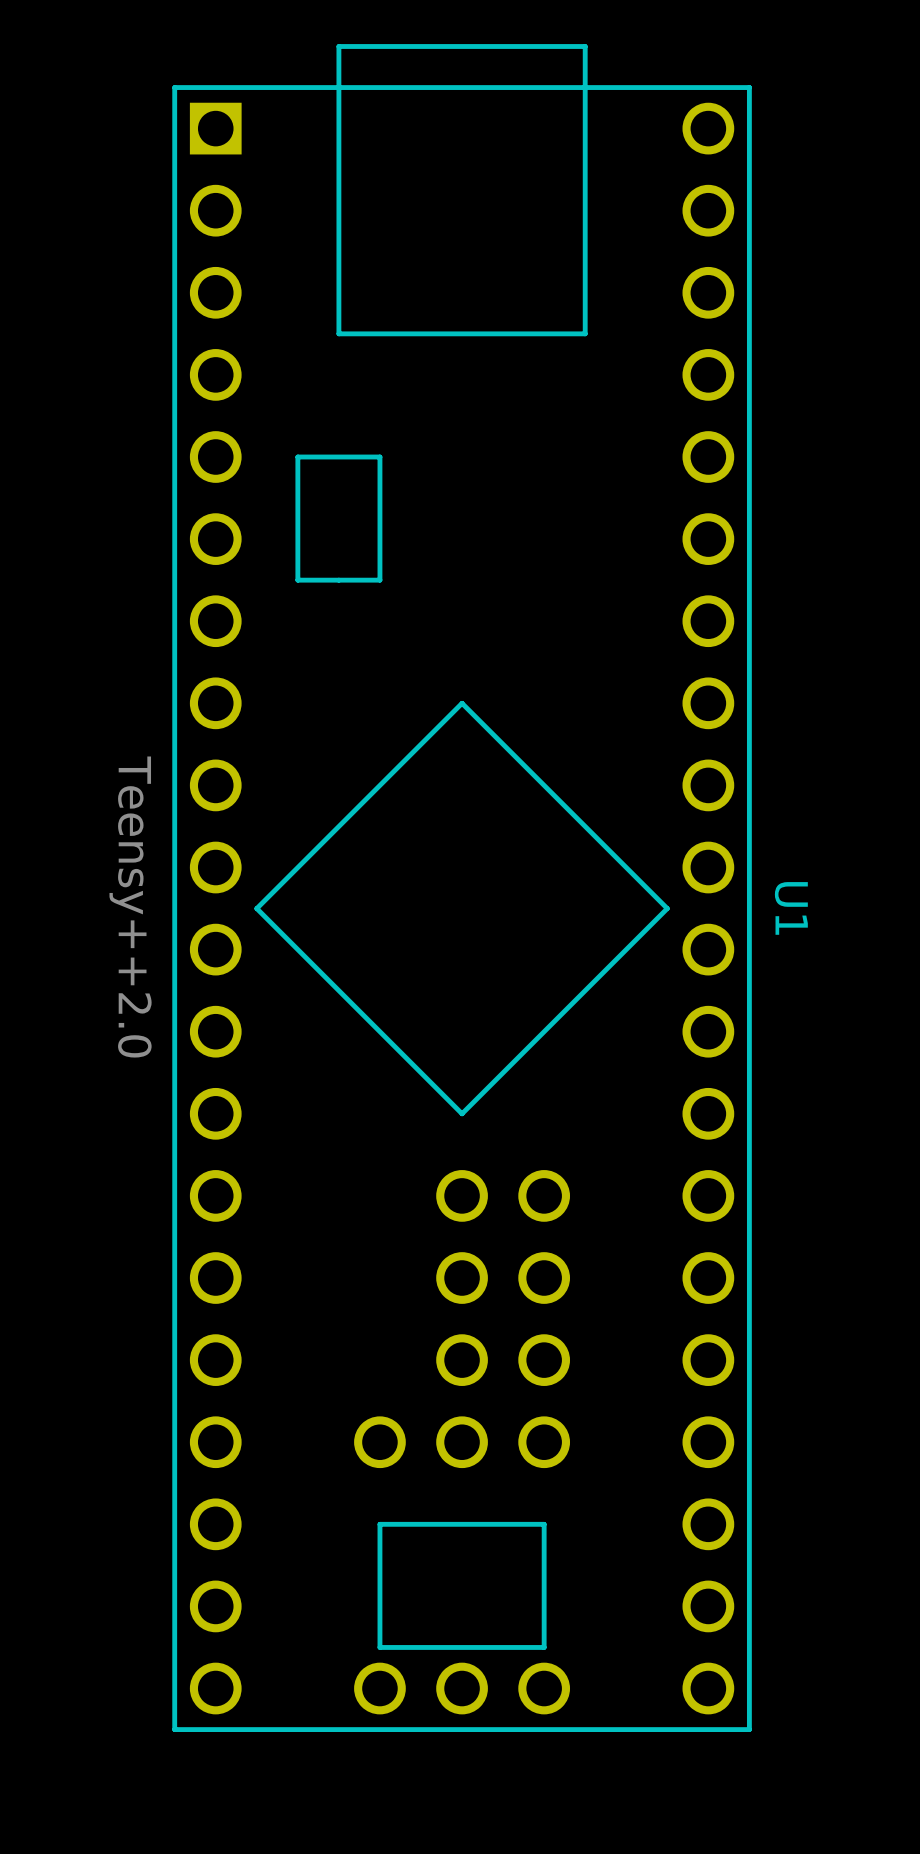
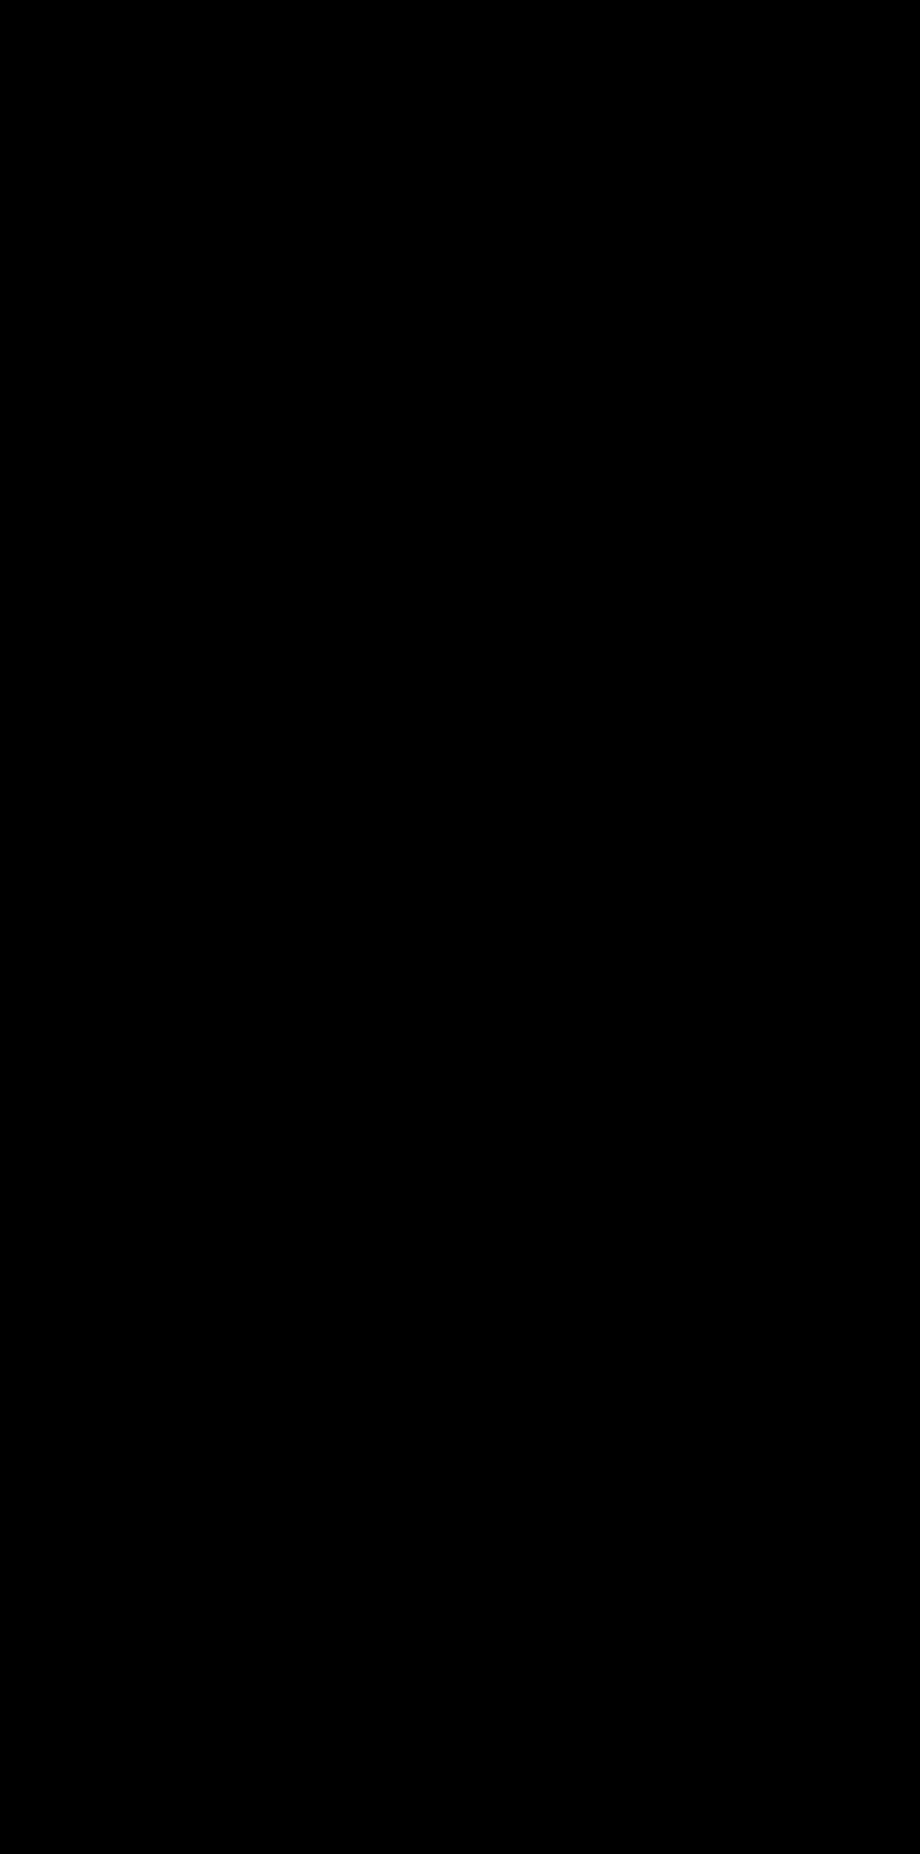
U1: Teensy++2.0 (462, 888) -> none

